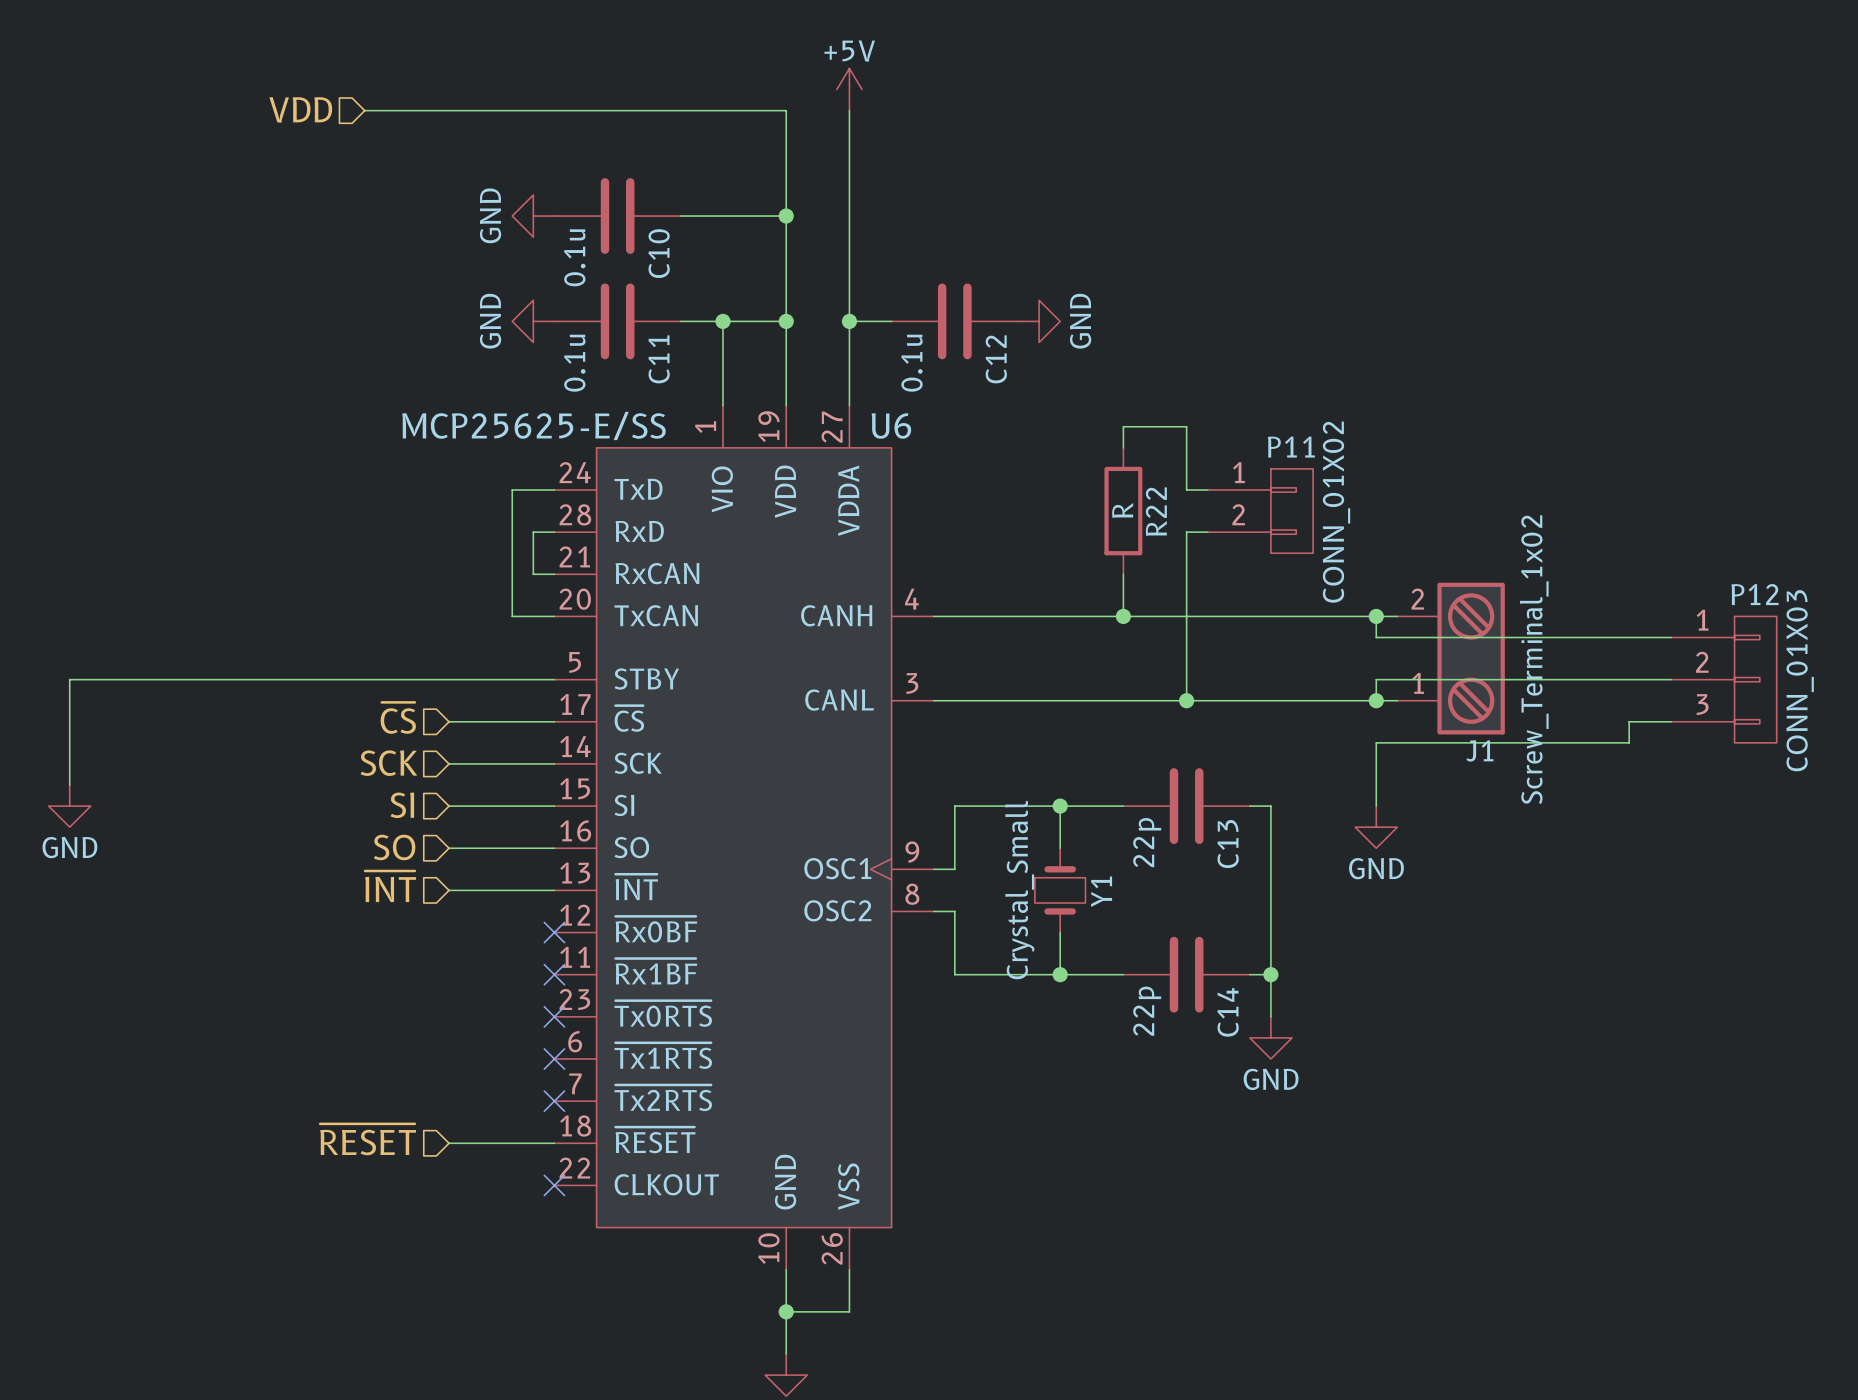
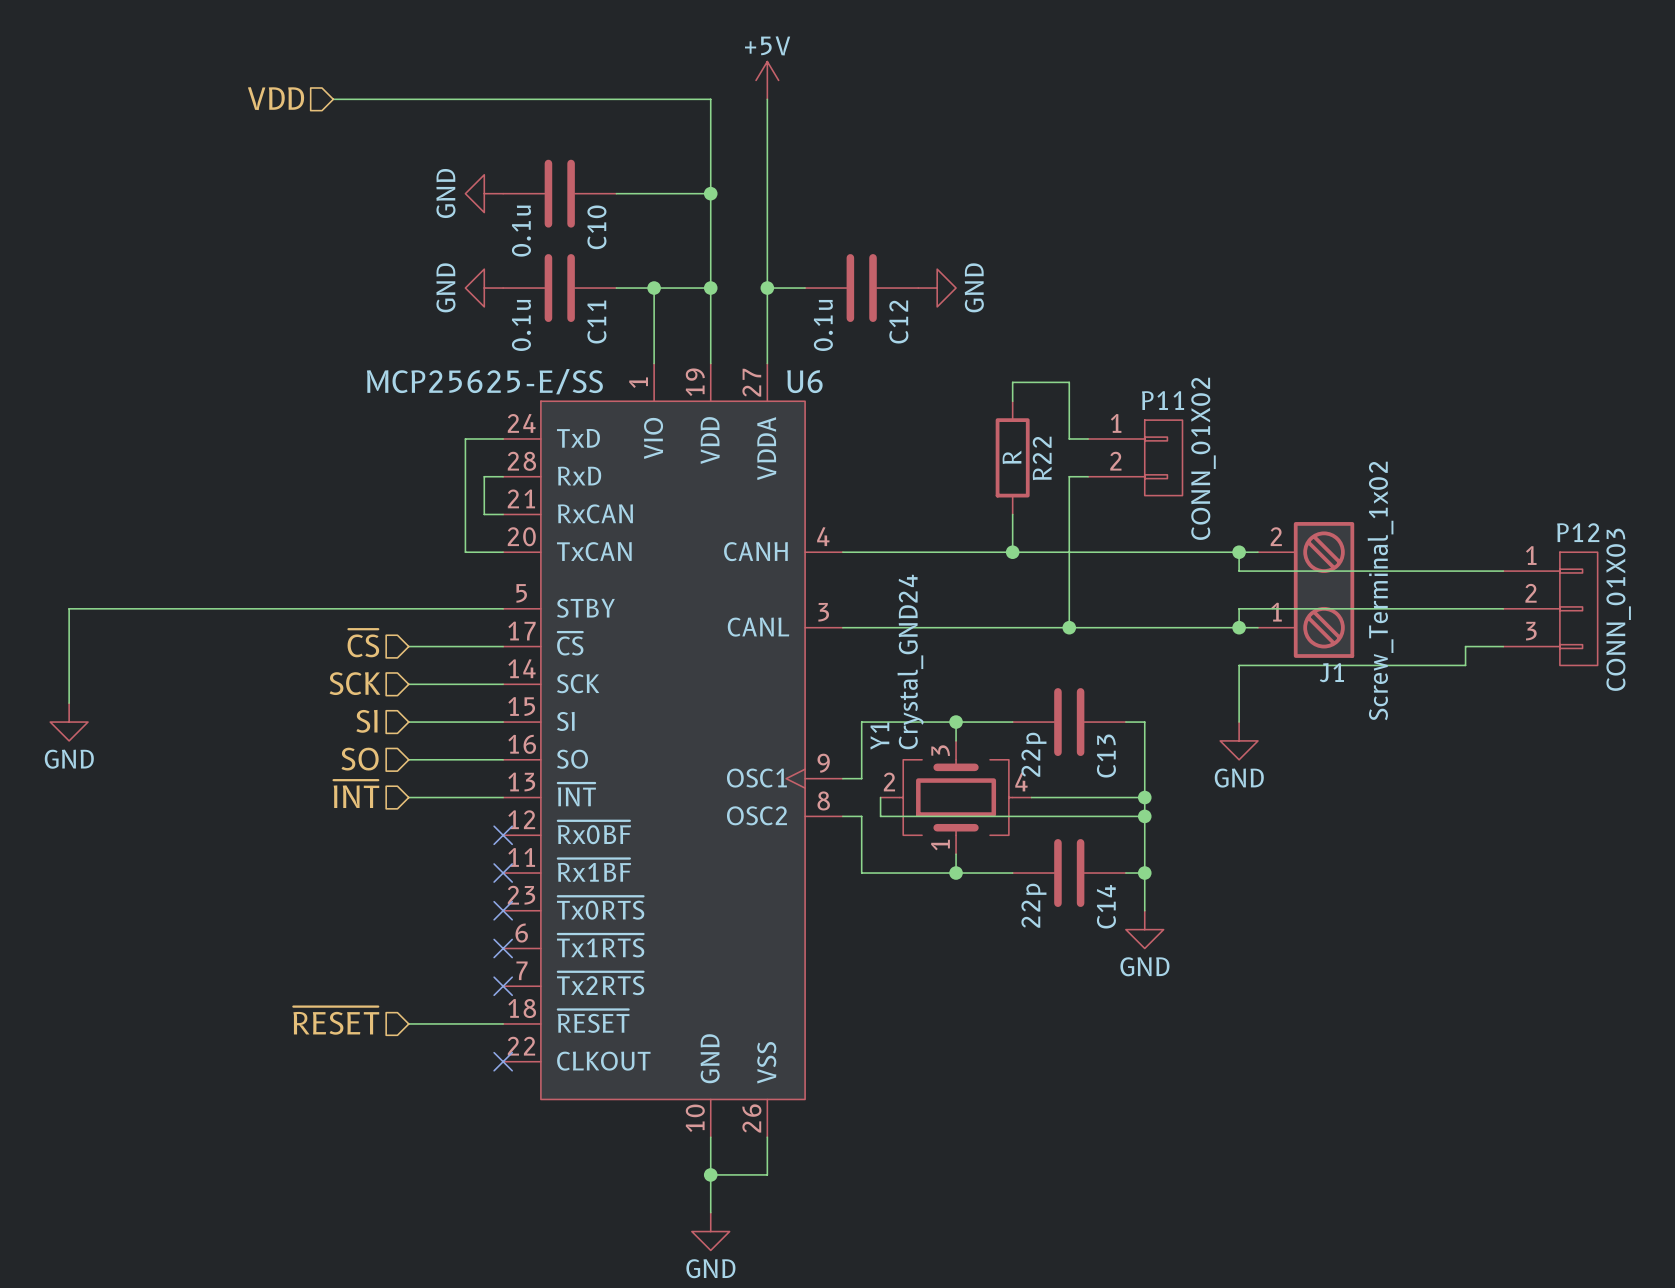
Y1 symbol: [1034, 848, 1086, 933] -> [880, 740, 1032, 855]
Y1 value: Crystal_Small (1019, 889) -> Crystal_GND24 (910, 661)
wire: none -> (880, 797) (880, 816) (1144, 816)
wire: none -> (1031, 797) (1144, 797)
junction: none -> (1144, 797)
Y1 name position: Y1 (1101, 891) -> Y1 (879, 736)
junction: none -> (1144, 816)

